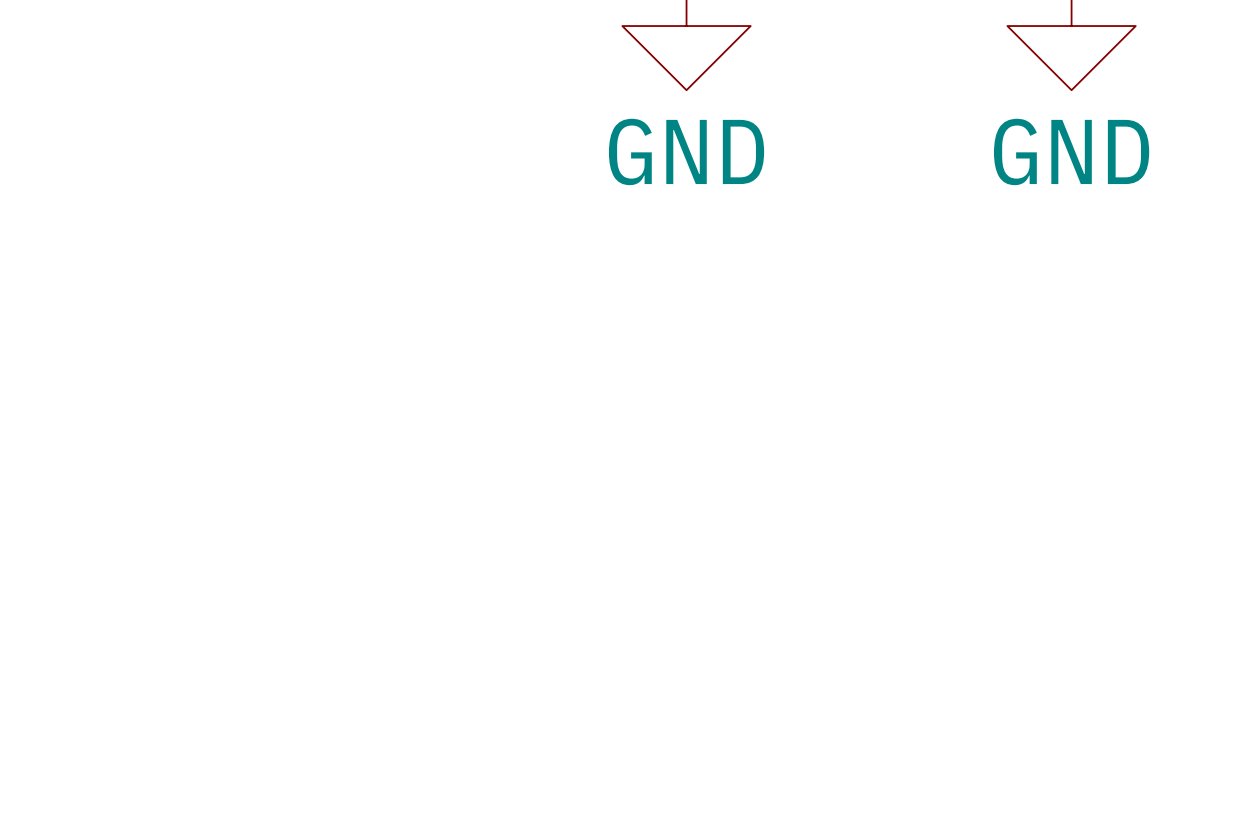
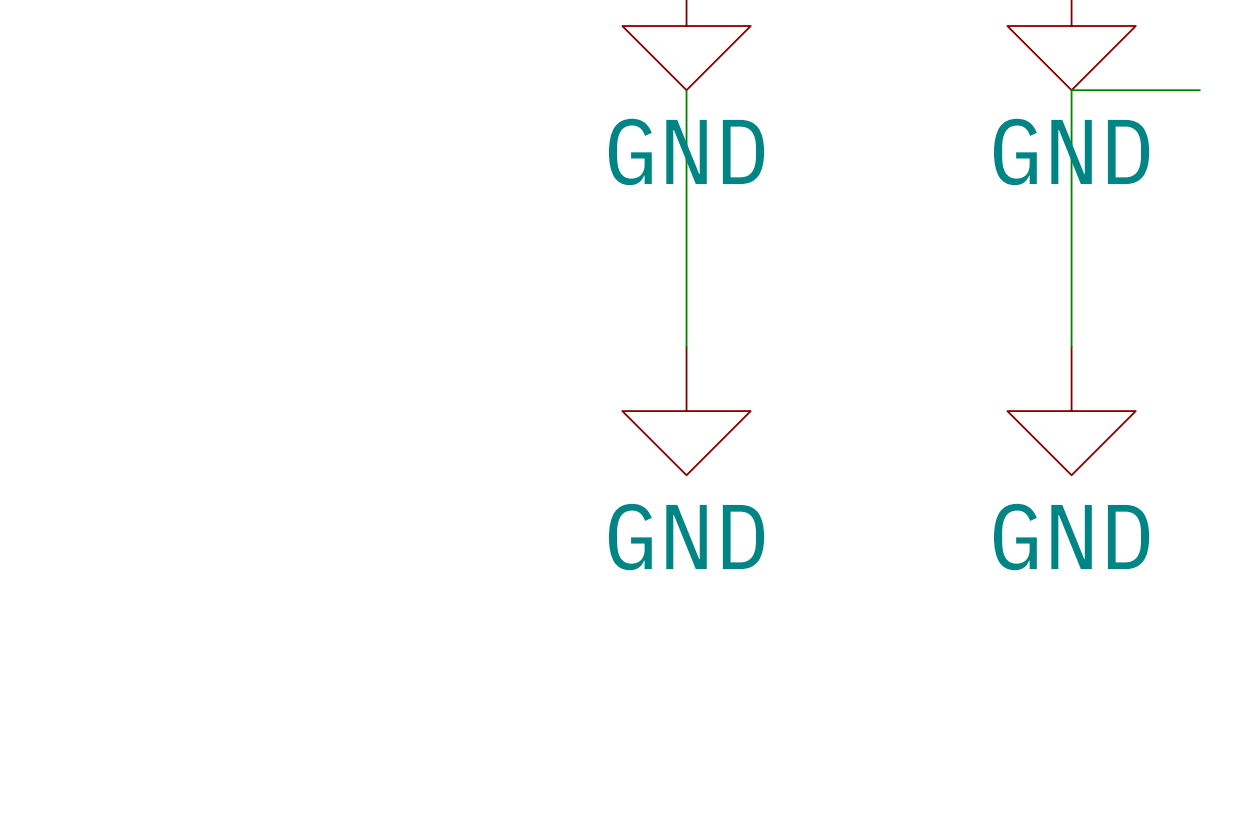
wire: none -> (686, 90) (686, 346)
wire: none -> (1199, 90) (1071, 90) (1071, 346)
power symbol: none -> GND (686, 411)
power symbol: none -> GND (1071, 411)

